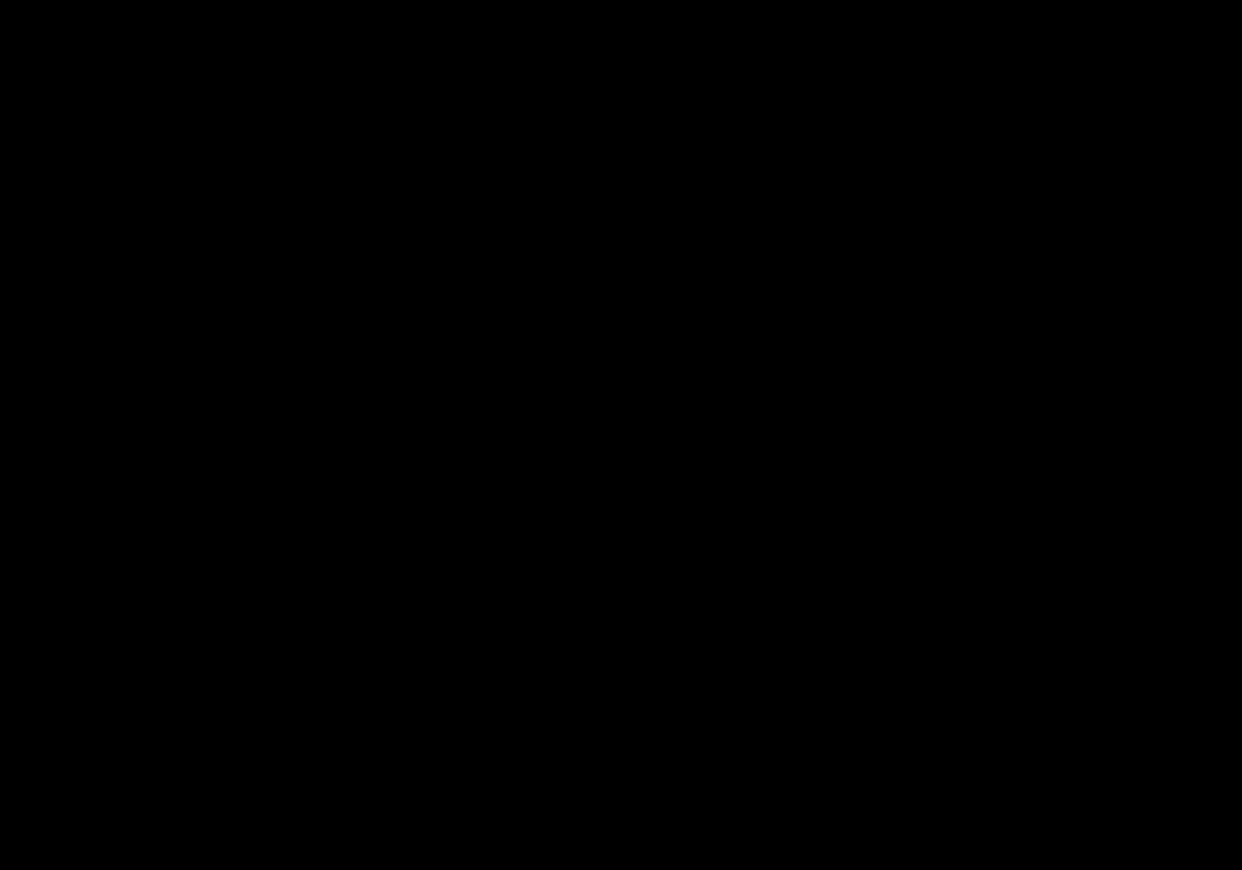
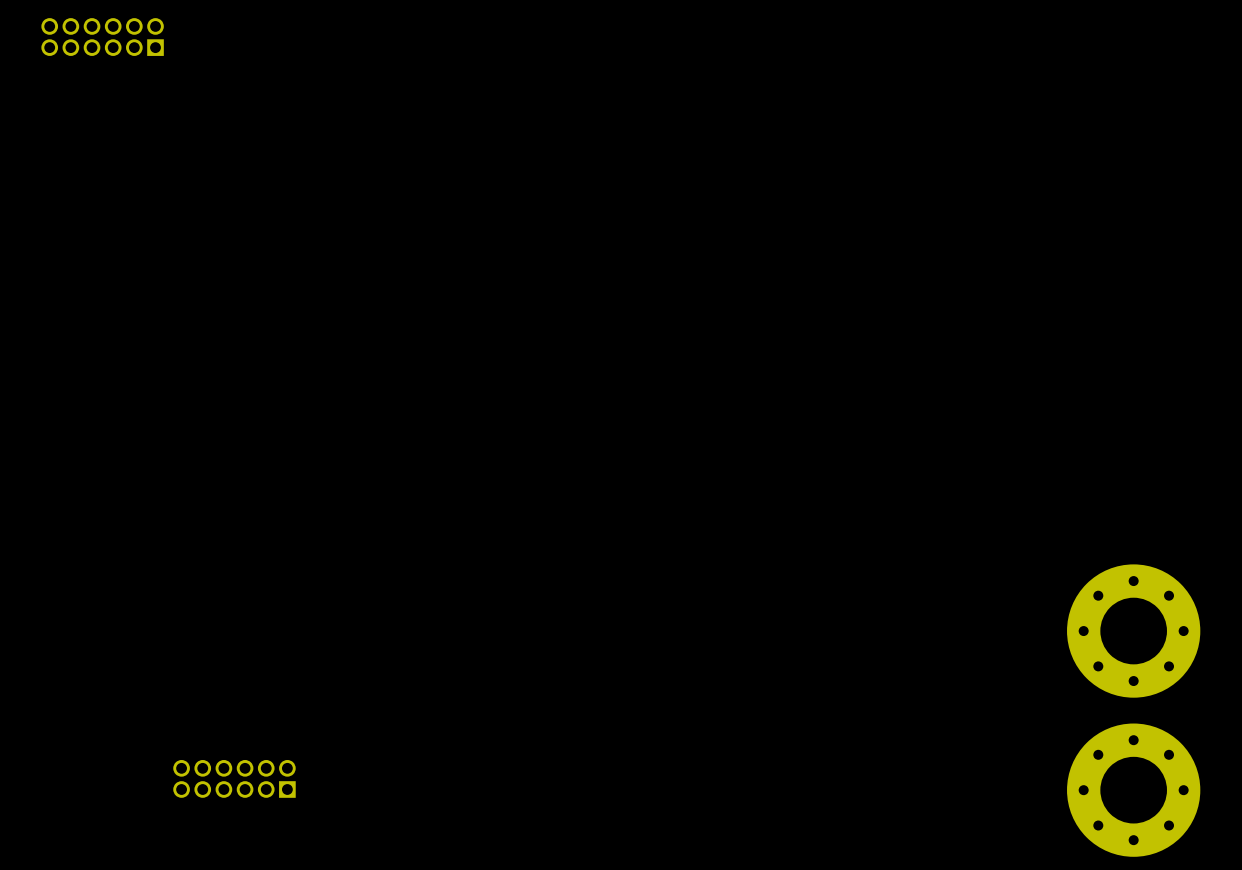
part: none -> (102, 37)
part: none -> (1133, 631)
part: none -> (234, 778)
part: none -> (1133, 790)

